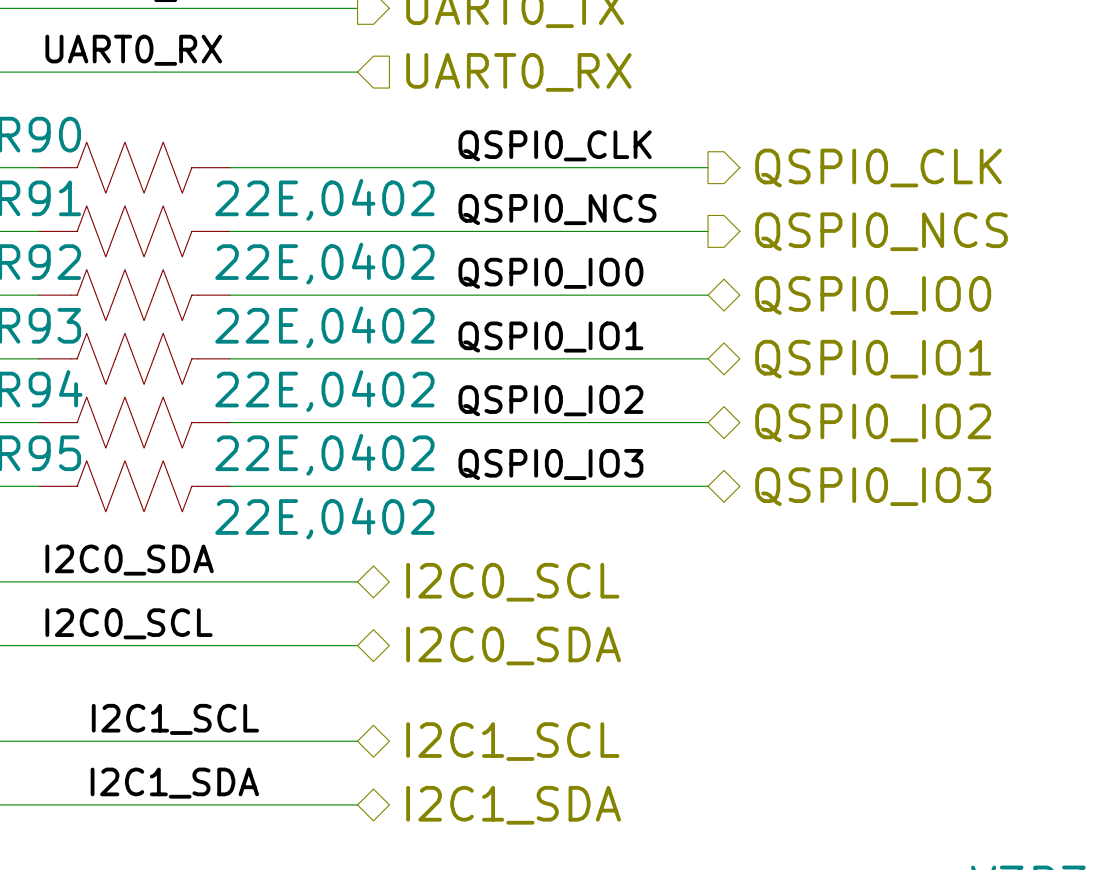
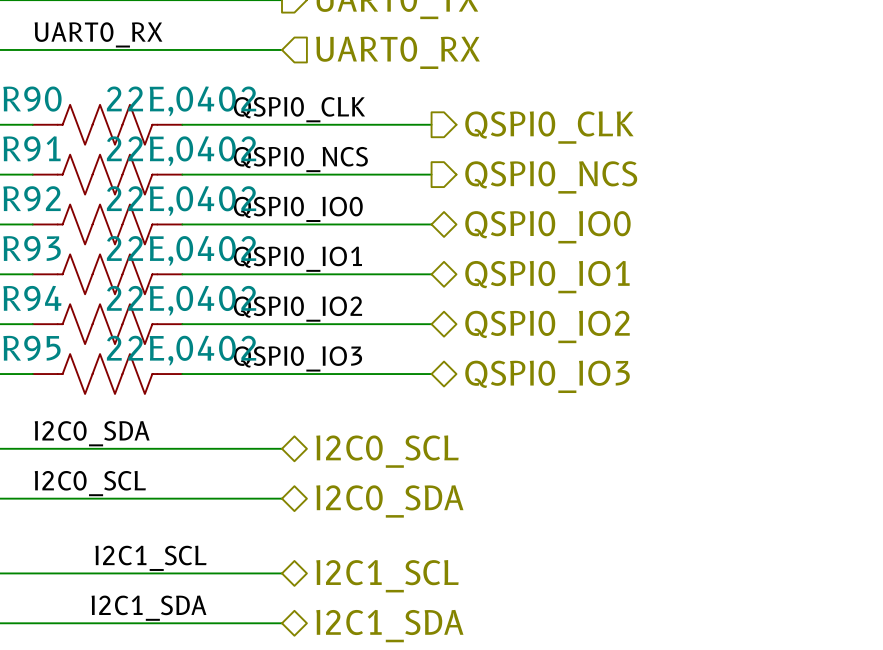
label position: QSPI0_CLK (555, 145) -> QSPI0_CLK (299, 109)
wire: (548, 167) (708, 167) -> none
hierarchical label position: QSPI0_CLK (878, 168) -> QSPI0_CLK (549, 127)
R90 value position: 22E,0402 (324, 199) -> 22E,0402 (181, 101)
label position: QSPI0_NCS (557, 209) -> QSPI0_NCS (300, 159)
wire: (548, 231) (708, 231) -> none
hierarchical label position: QSPI0_NCS (881, 231) -> QSPI0_NCS (551, 177)
R91 value position: 22E,0402 (324, 263) -> 22E,0402 (181, 151)
label position: QSPI0_IO0 (550, 273) -> QSPI0_IO0 (298, 209)
wire: (548, 295) (708, 295) -> none
hierarchical label position: QSPI0_IO0 (873, 295) -> QSPI0_IO0 (547, 227)
R92 value position: 22E,0402 (324, 327) -> 22E,0402 (181, 201)
label position: QSPI0_IO1 (550, 337) -> QSPI0_IO1 (297, 259)
wire: (548, 358) (708, 358) -> none
hierarchical label position: QSPI0_IO1 (873, 359) -> QSPI0_IO1 (547, 277)
R93 value position: 22E,0402 (324, 391) -> 22E,0402 (181, 250)
label position: QSPI0_IO2 (550, 400) -> QSPI0_IO2 (297, 309)
wire: (548, 422) (708, 422) -> none
hierarchical label position: QSPI0_IO2 (873, 422) -> QSPI0_IO2 (547, 326)
R94 value position: 22E,0402 (324, 454) -> 22E,0402 (181, 300)
label position: QSPI0_IO3 (550, 464) -> QSPI0_IO3 (297, 358)
wire: (548, 486) (708, 486) -> none
hierarchical label position: QSPI0_IO3 (873, 486) -> QSPI0_IO3 (547, 376)
R95 value position: 22E,0402 (324, 518) -> 22E,0402 (181, 350)

